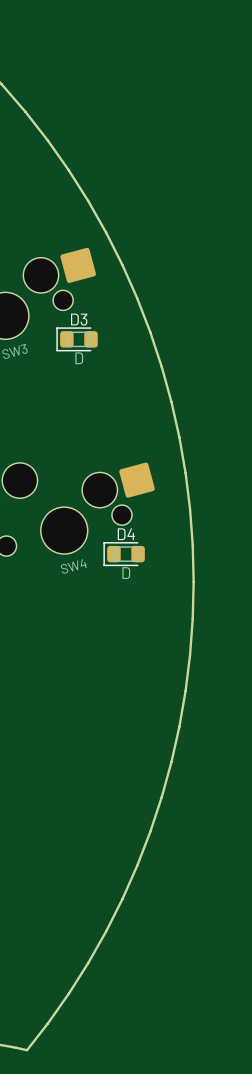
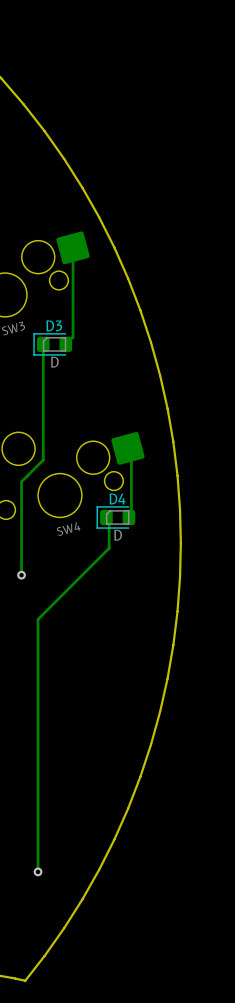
track: none -> (73, 247) (73, 337) (65, 344)
D3 position: (77, 339) -> (52, 344)
track: none -> (43, 344) (43, 460) (21, 481) (21, 575)
track: none -> (127, 448) (131, 451) (131, 514)
track: none -> (109, 514) (109, 548) (38, 619) (38, 871)
via: none -> (21, 575)
via: none -> (38, 871)

